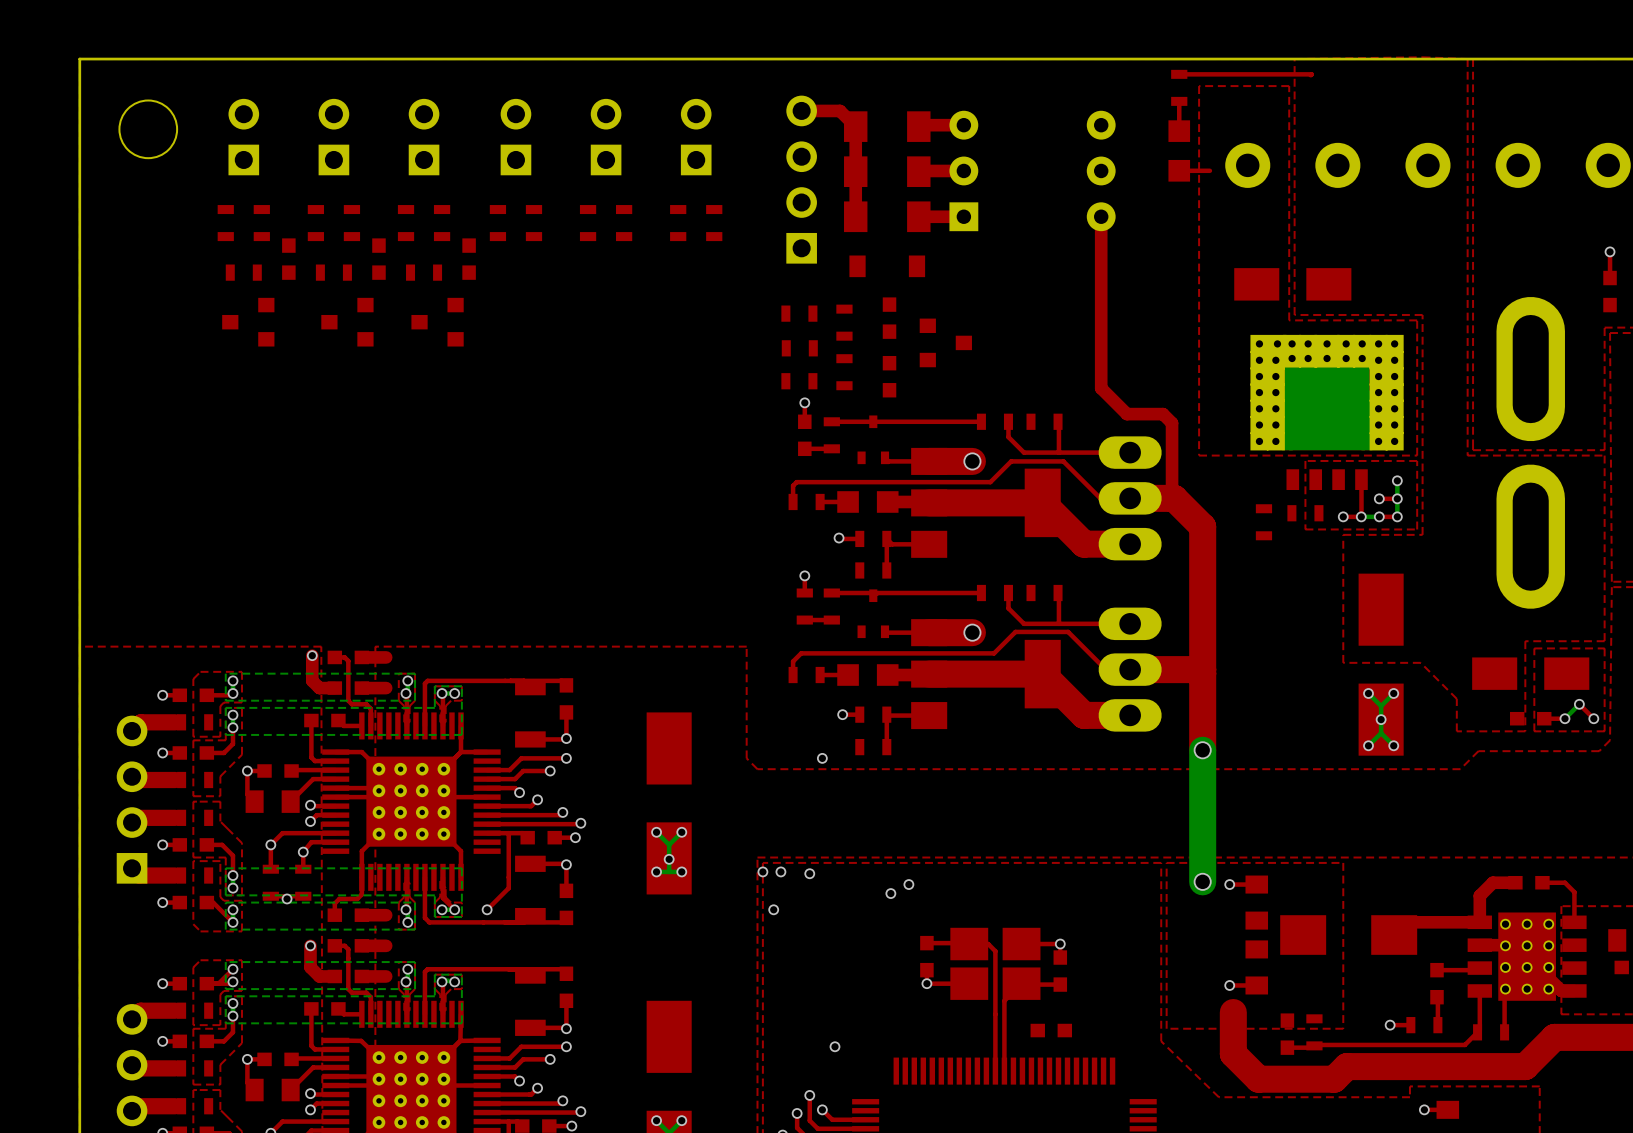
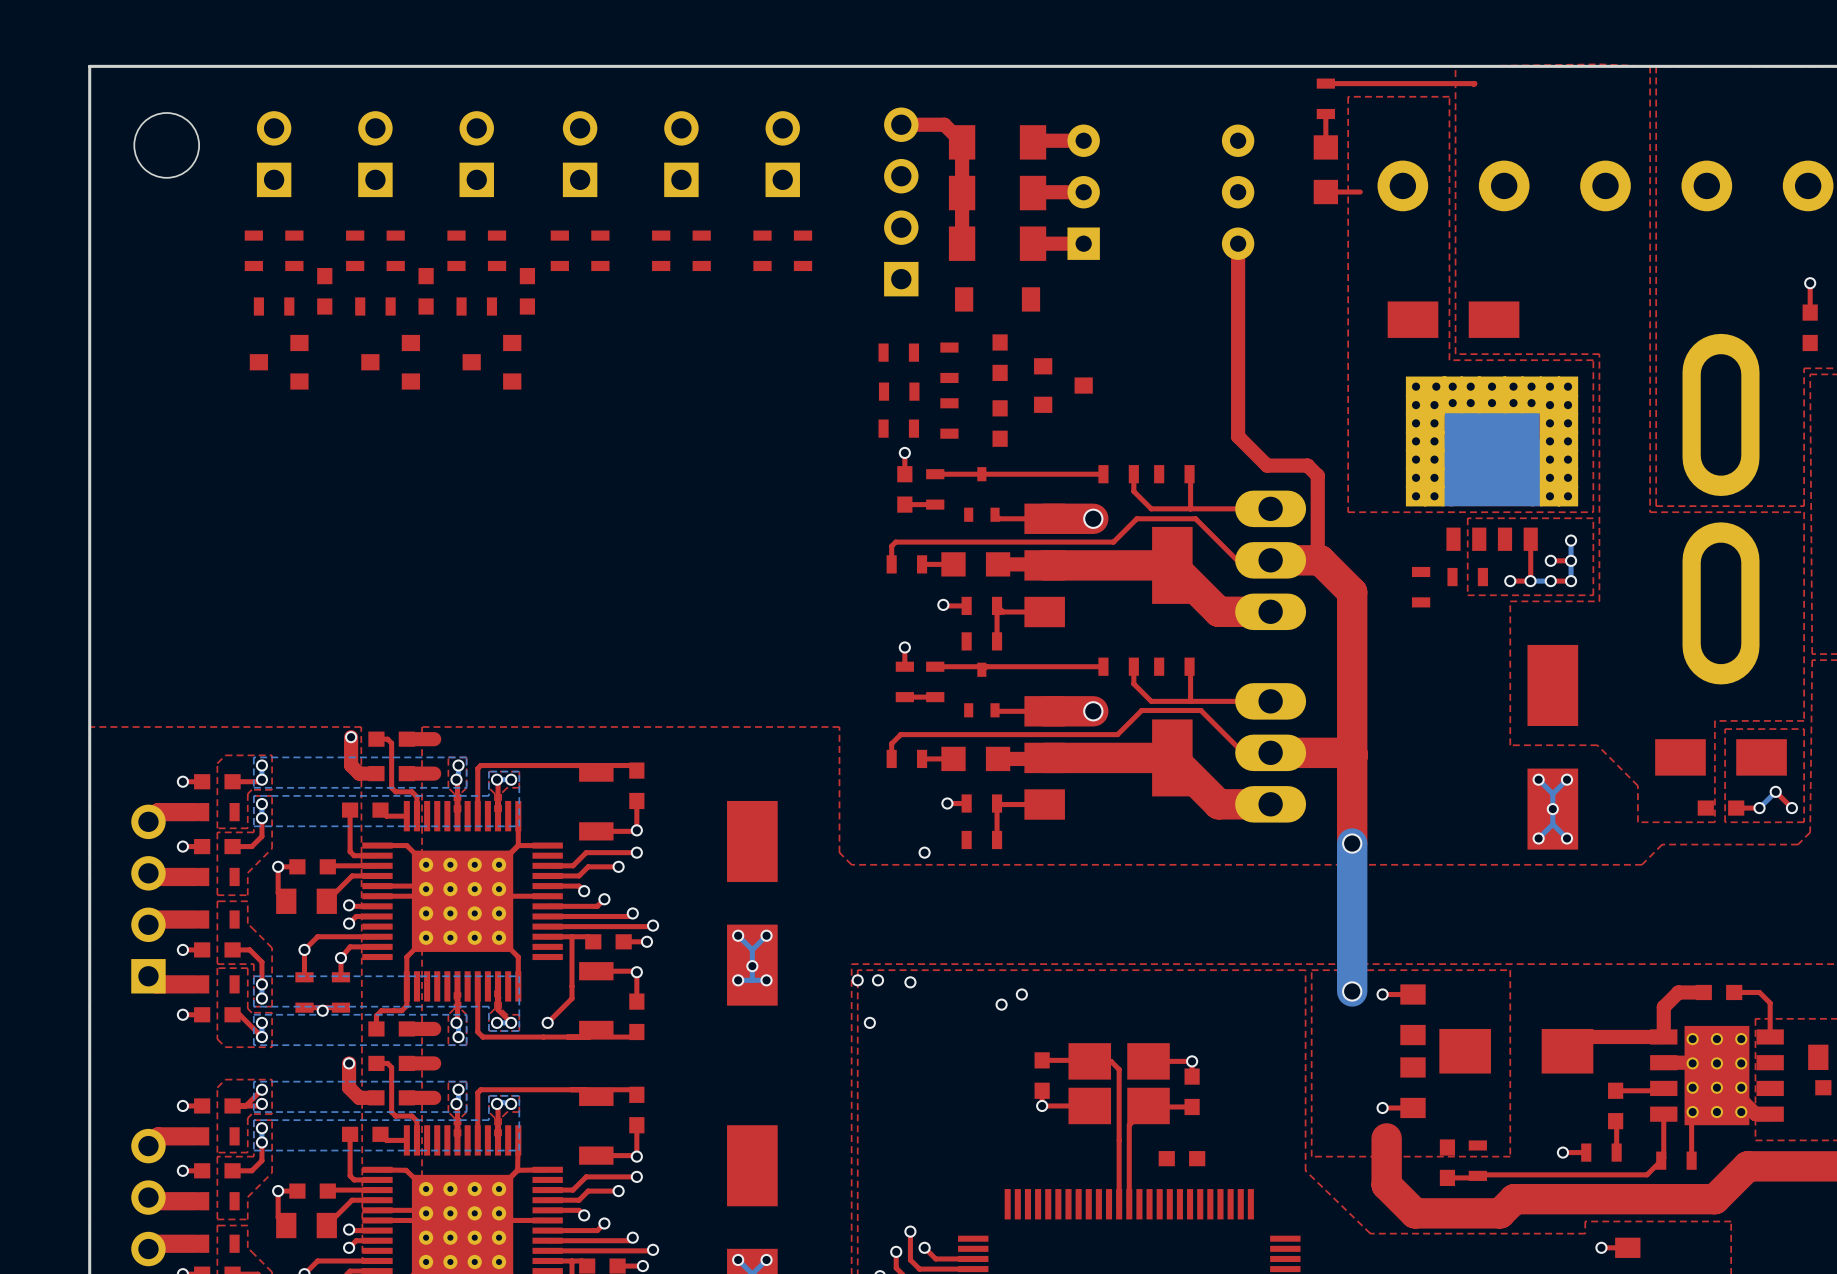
via: (834, 1046) -> none

